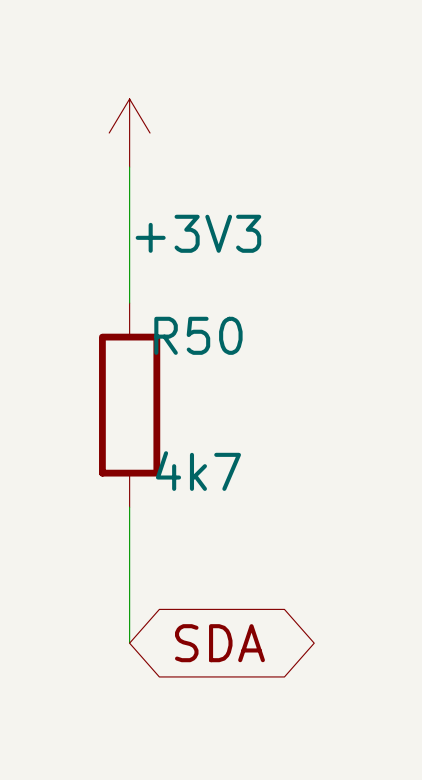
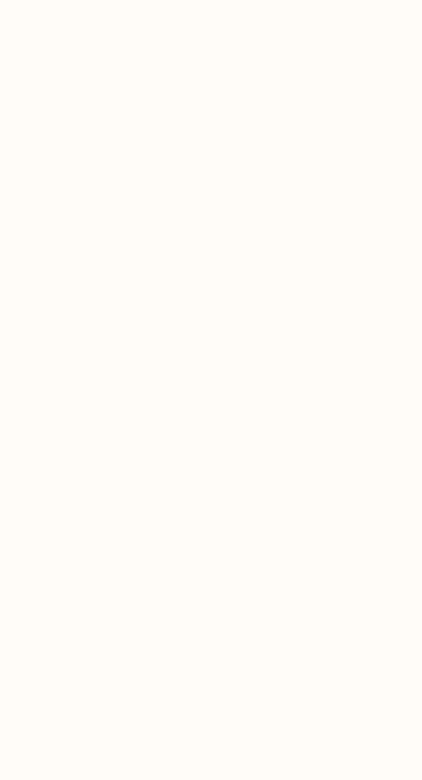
power symbol: +3V3 (129, 133) -> none
wire: (129, 167) (129, 303) -> none
R50: 4k7 (129, 405) -> none
wire: (129, 507) (129, 643) -> none
global label: SDA (219, 643) -> none

